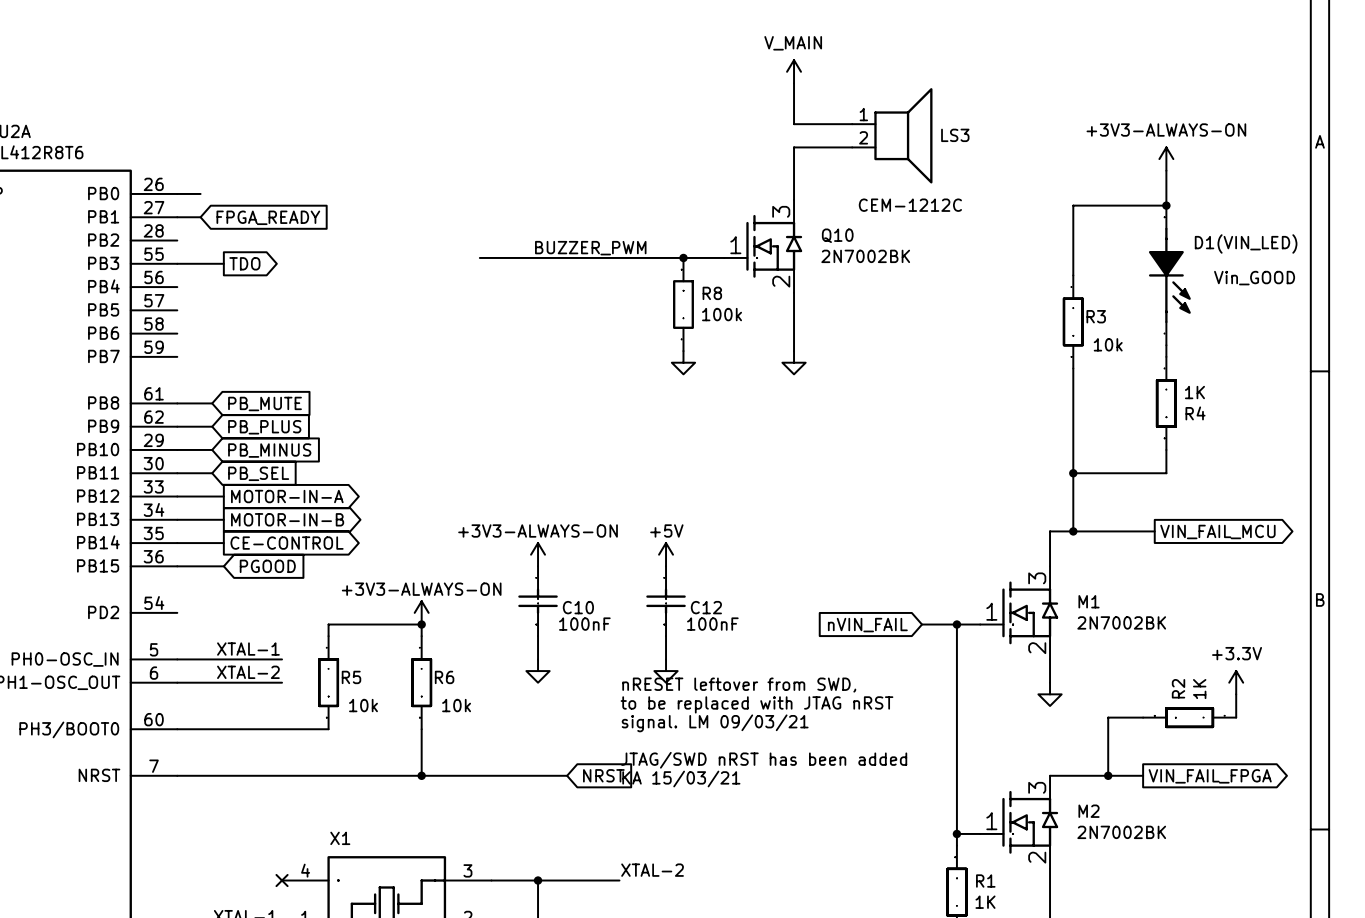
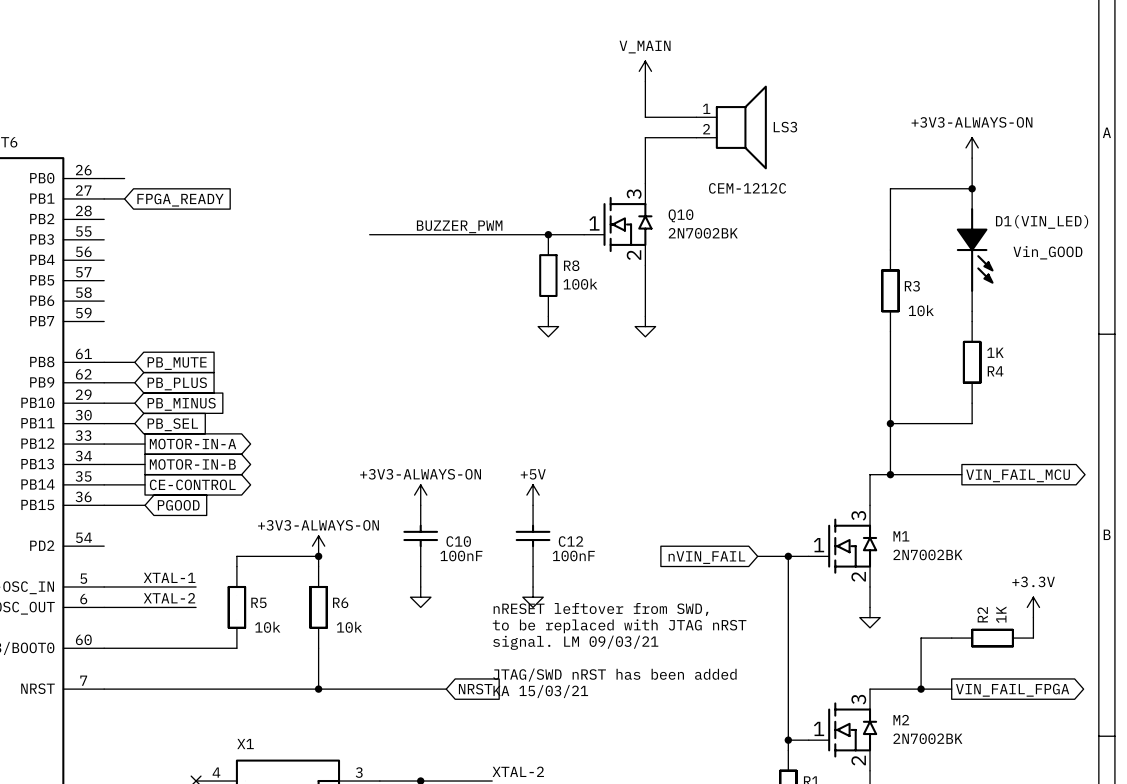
wire: (177, 263) (223, 263) -> none
global label: TDO (244, 263) -> none

